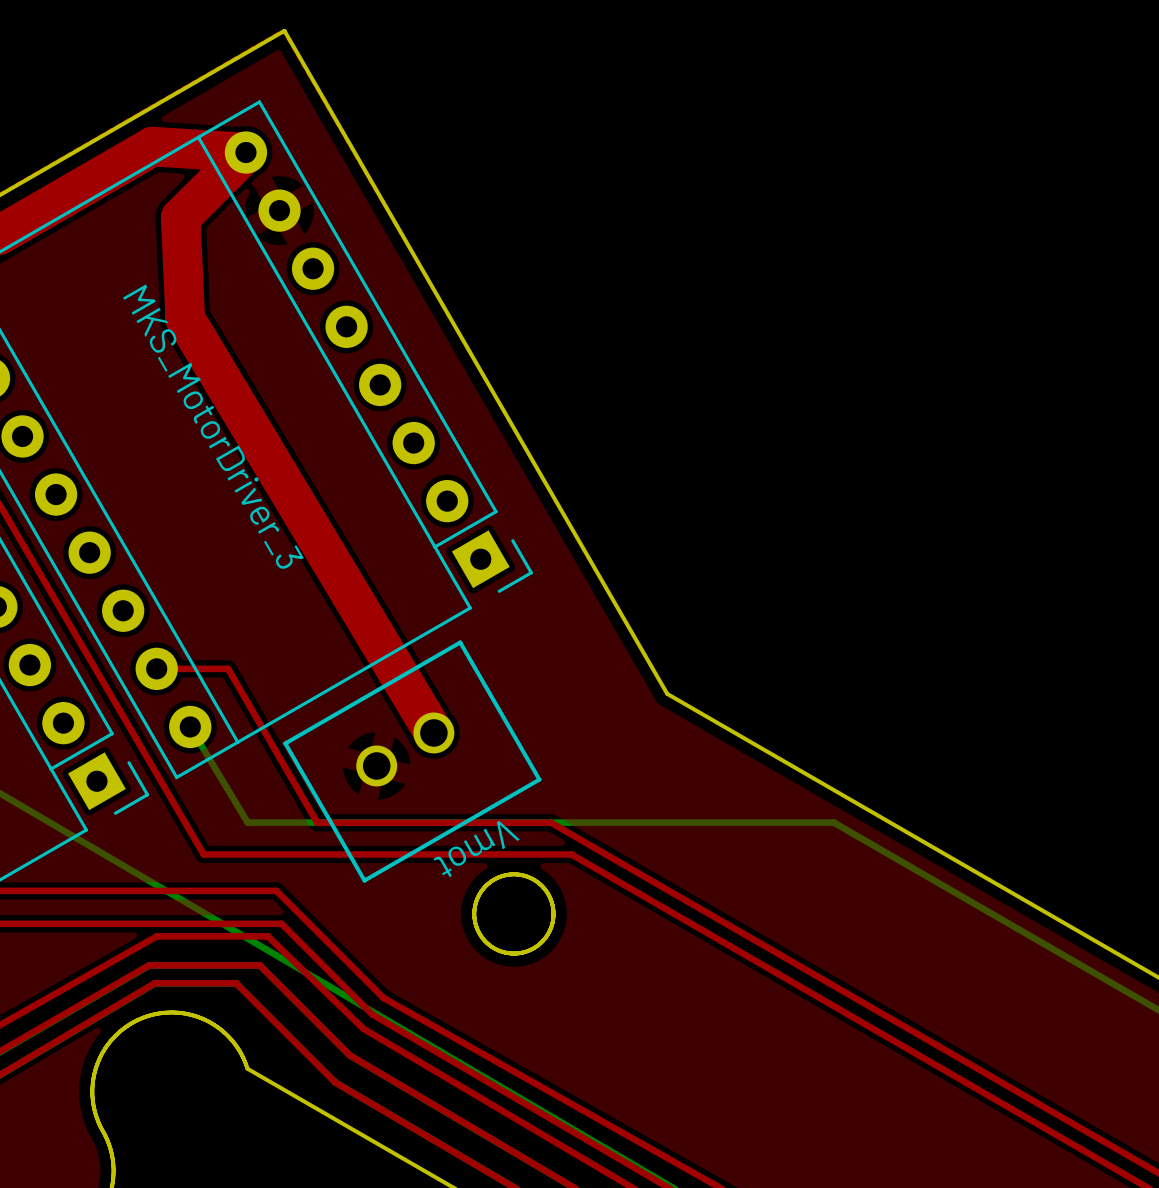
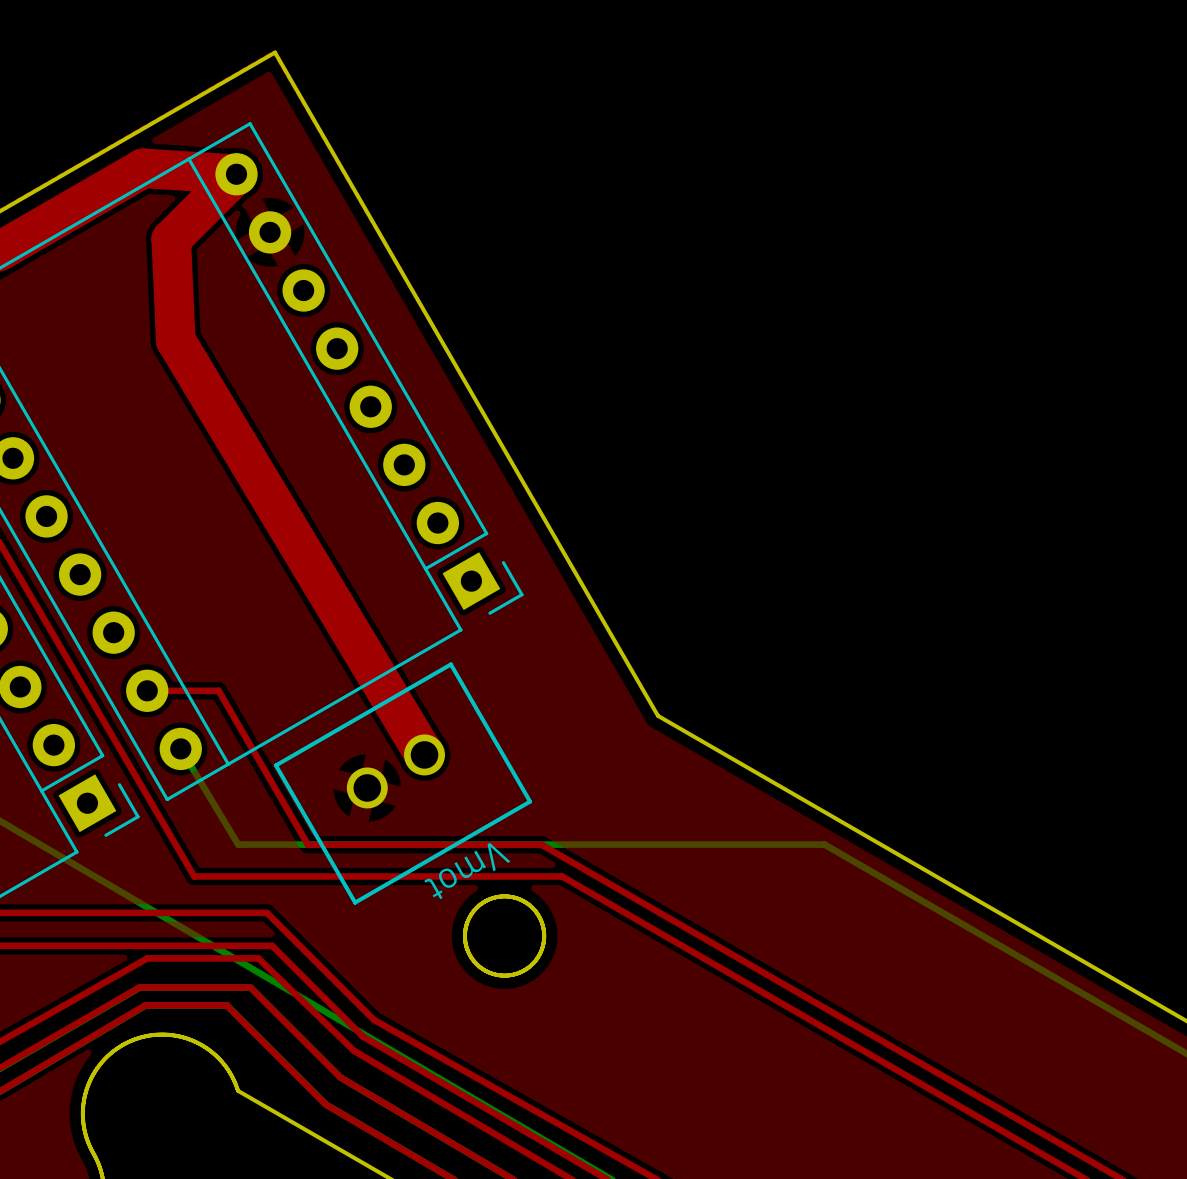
MKS_MotorDriver_3 name: MKS_MotorDriver_3 (213, 426) -> none

